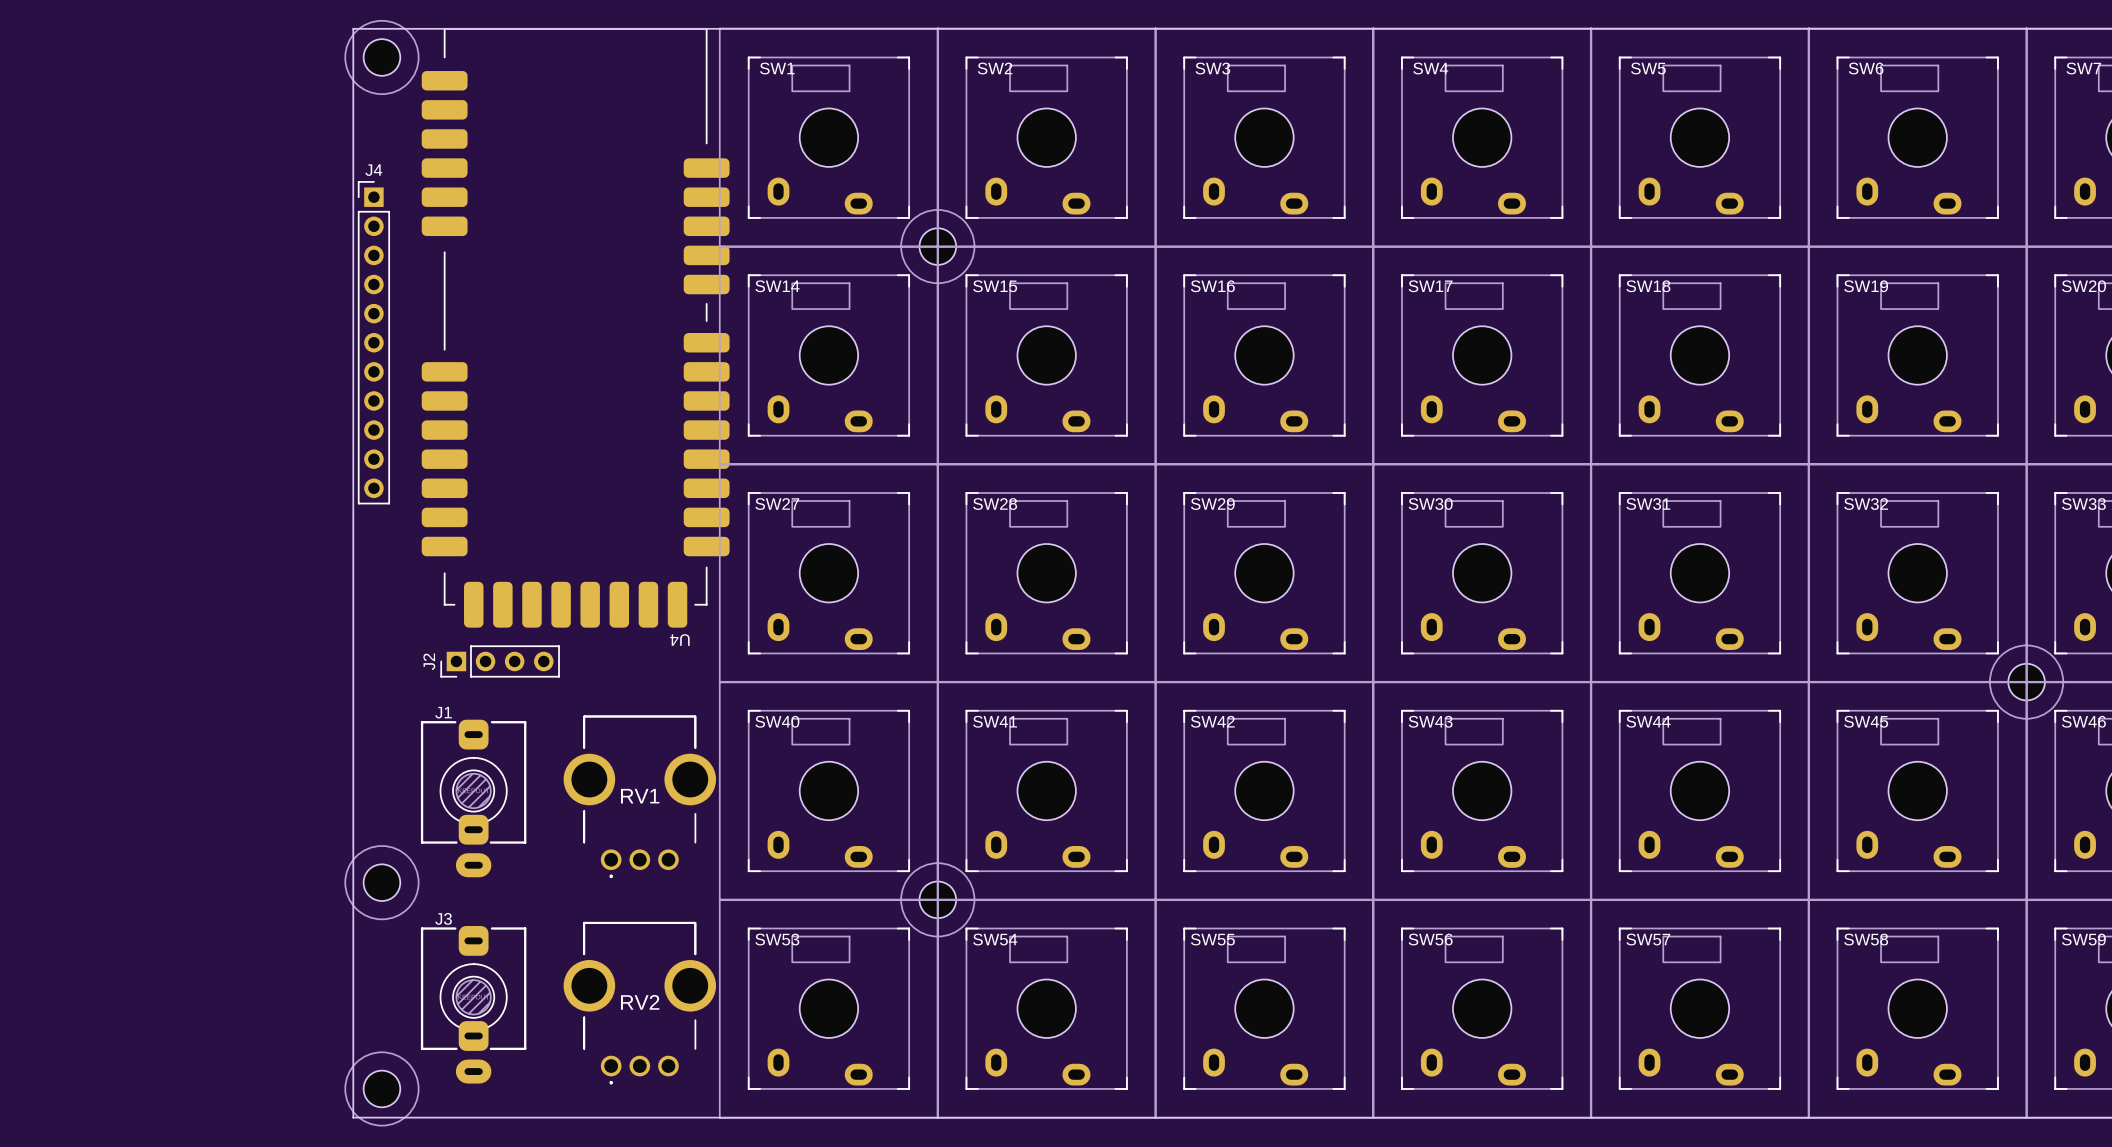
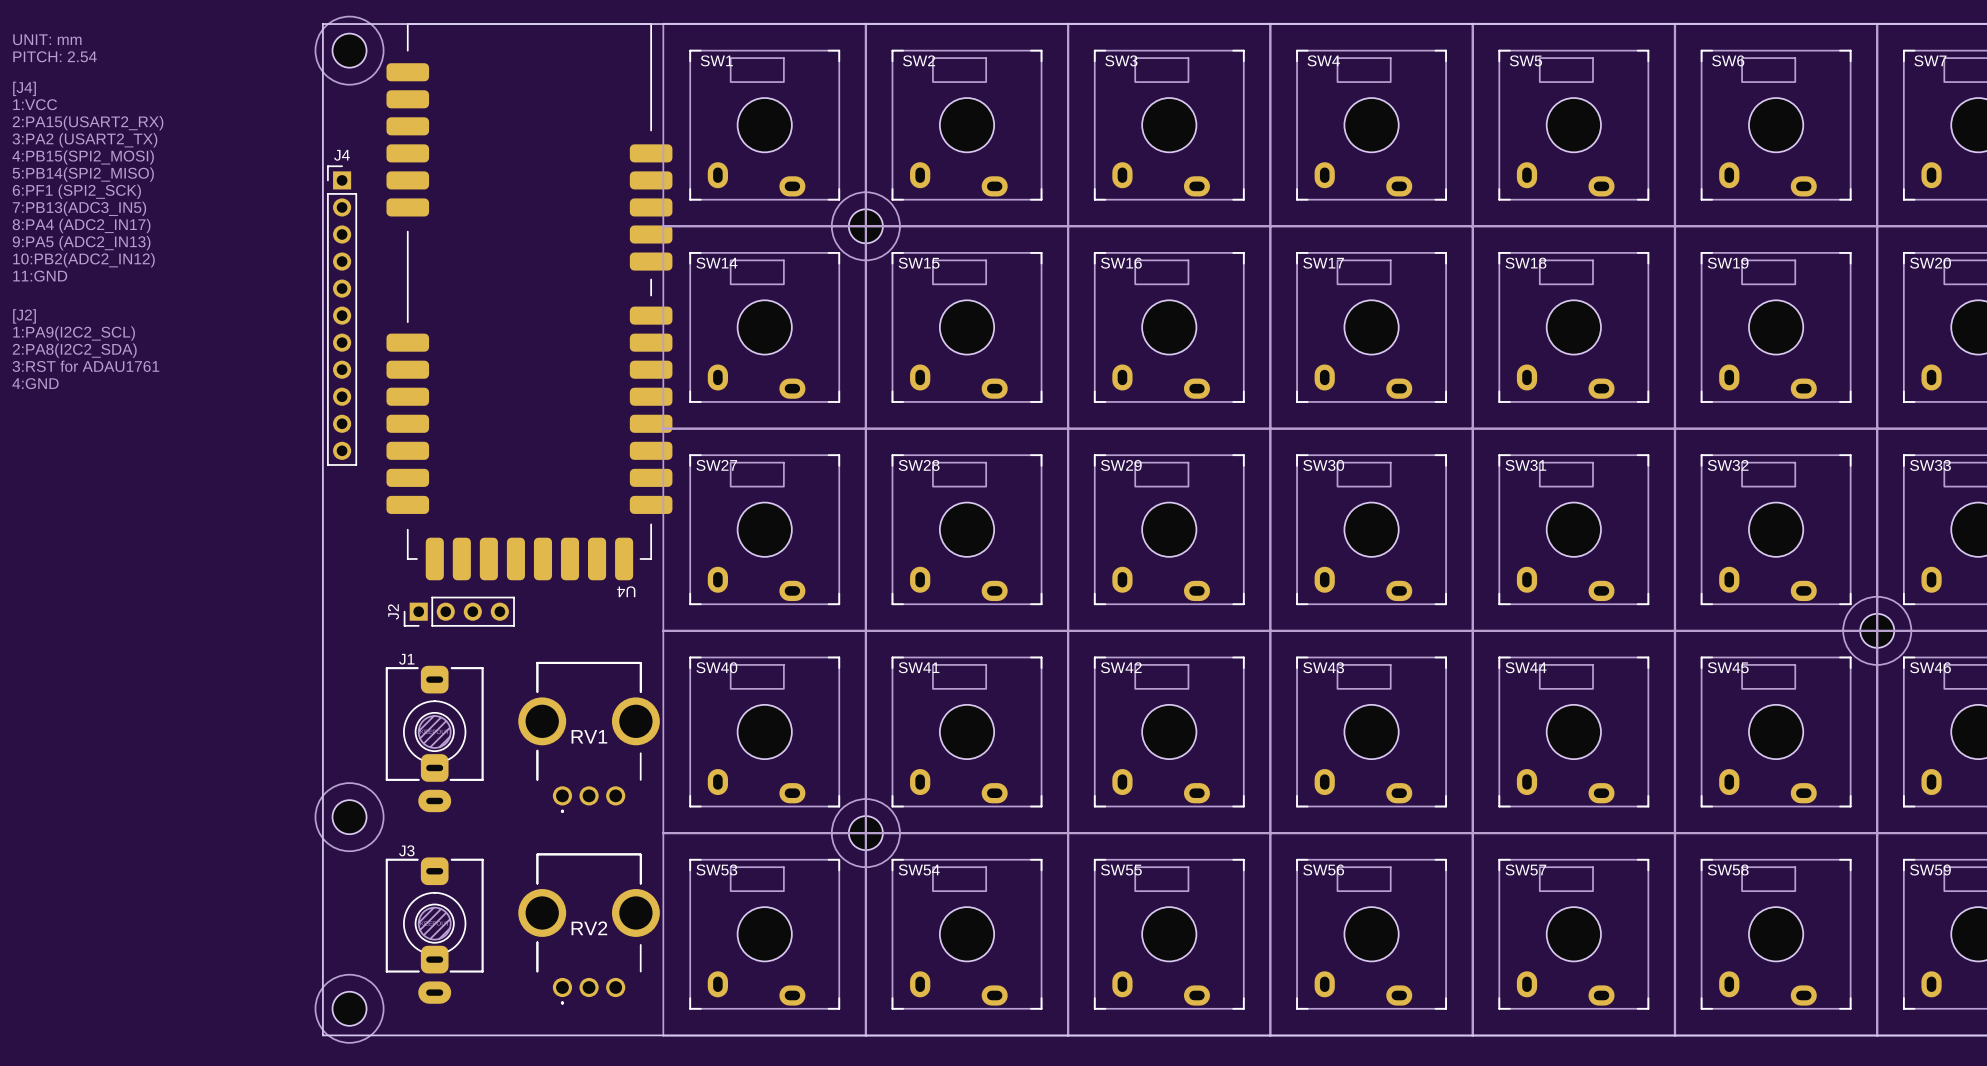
text: none -> UNIT: mm (47, 39)
text: none -> PITCH: 2.54 (55, 56)
text: none -> [J4] (24, 88)
text: none -> 1:VCC (35, 104)
text: none -> 2:PA15(USART2_RX) (88, 123)
text: none -> 3:PA2 (USART2_TX) (84, 140)
text: none -> 4:PB15(SPI2_MOSI) (83, 157)
text: none -> 5:PB14(SPI2_MISO) (83, 174)
text: none -> 6:PF1 (SPI2_SCK) (76, 191)
text: none -> 7:PB13(ADC3_IN5) (79, 208)
text: none -> 8:PA4 (ADC2_IN17) (81, 225)
text: none -> 9:PA5 (ADC2_IN13) (81, 243)
text: none -> 10:PB2(ADC2_IN12) (83, 260)
text: none -> 11:GND (40, 276)
text: none -> [J2] (24, 316)
text: none -> 1:PA9(I2C2_SCL) (74, 333)
text: none -> 2:PA8(I2C2_SDA) (74, 350)
text: none -> 3:RST for ADAU1761 (85, 366)
text: none -> 4:GND (35, 383)

